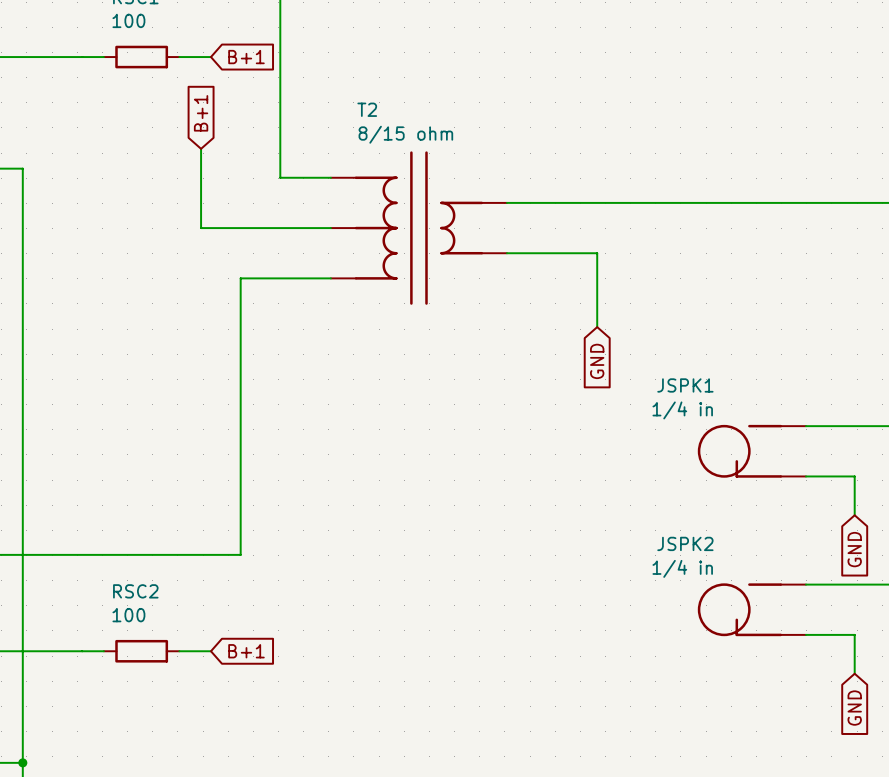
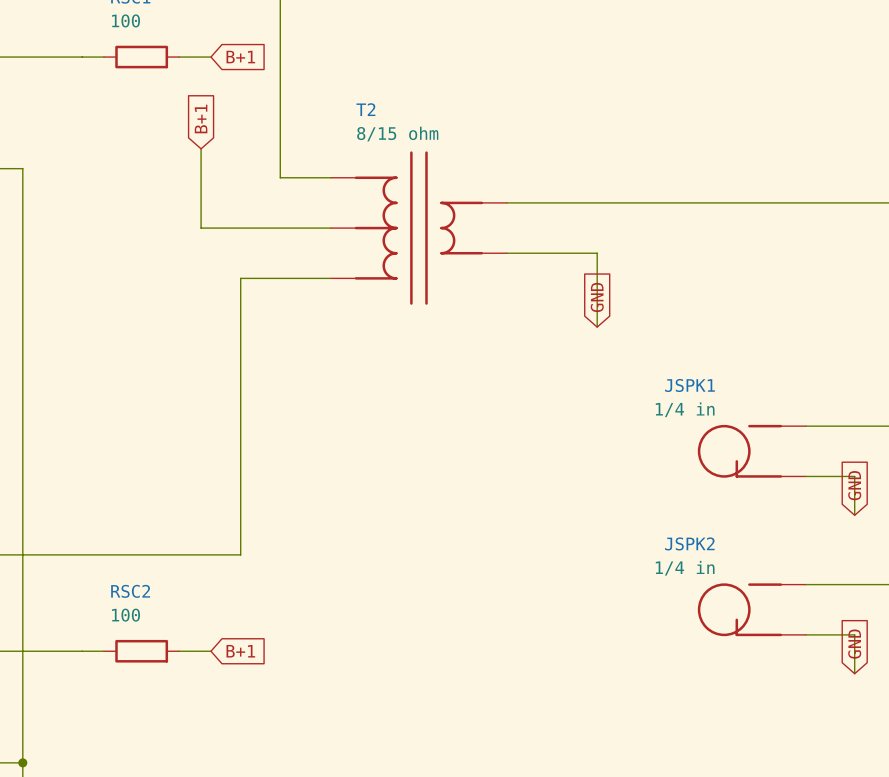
global label rotation: 0° (597, 361) -> 180° (597, 297)
global label rotation: 0° (854, 549) -> 180° (854, 485)
global label rotation: 0° (854, 708) -> 180° (854, 644)

